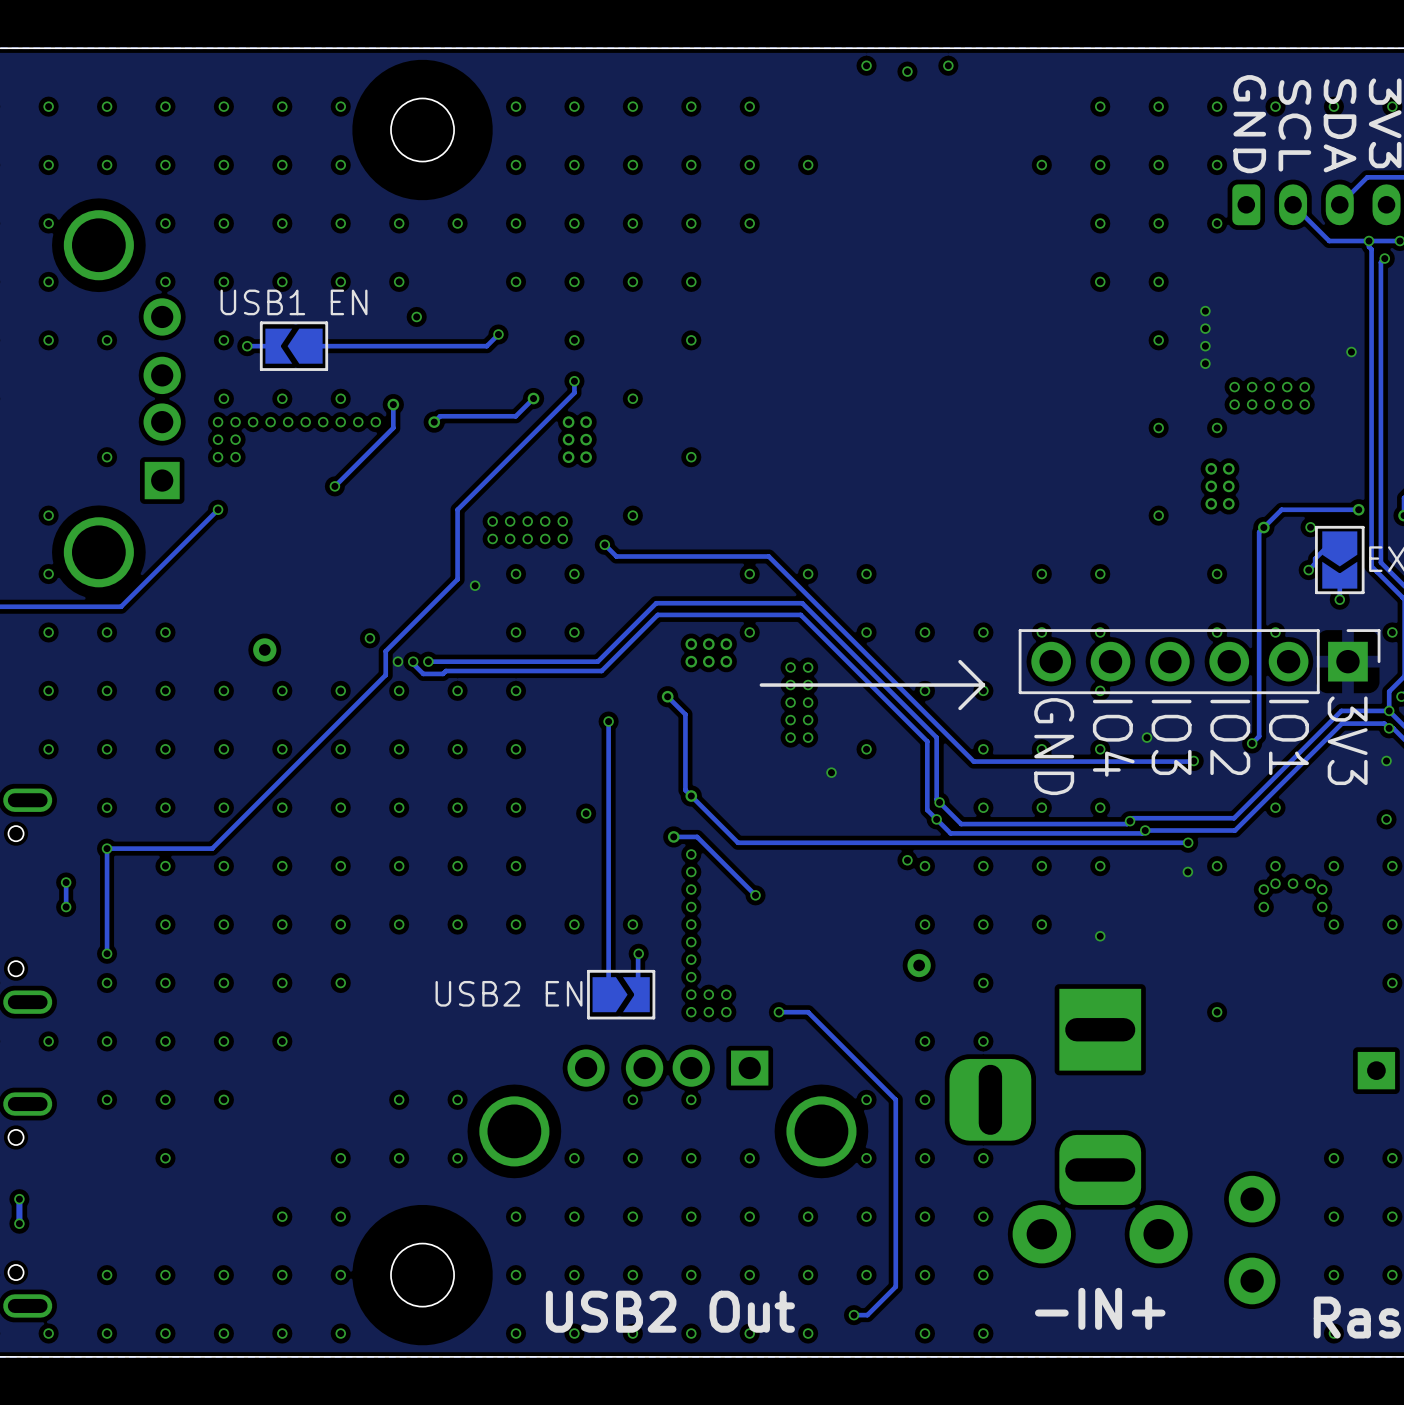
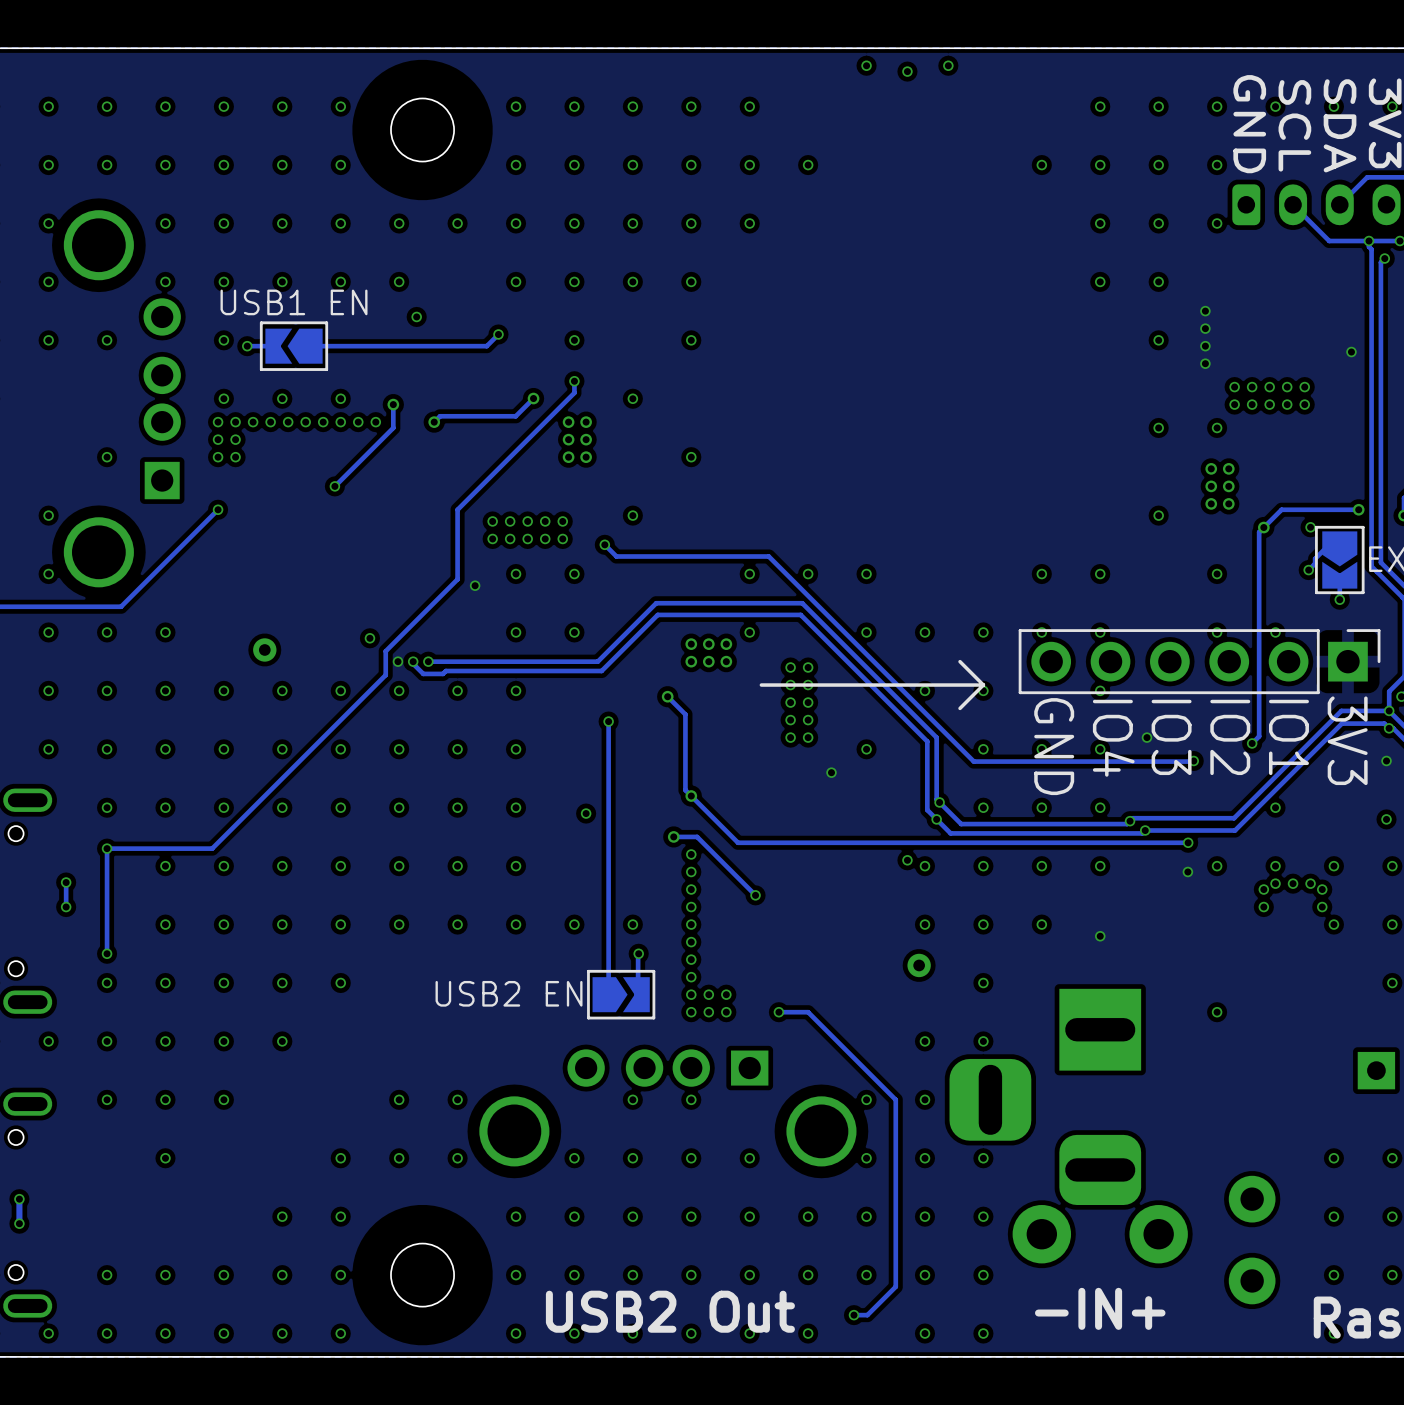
via: (1392, 632) -> none

